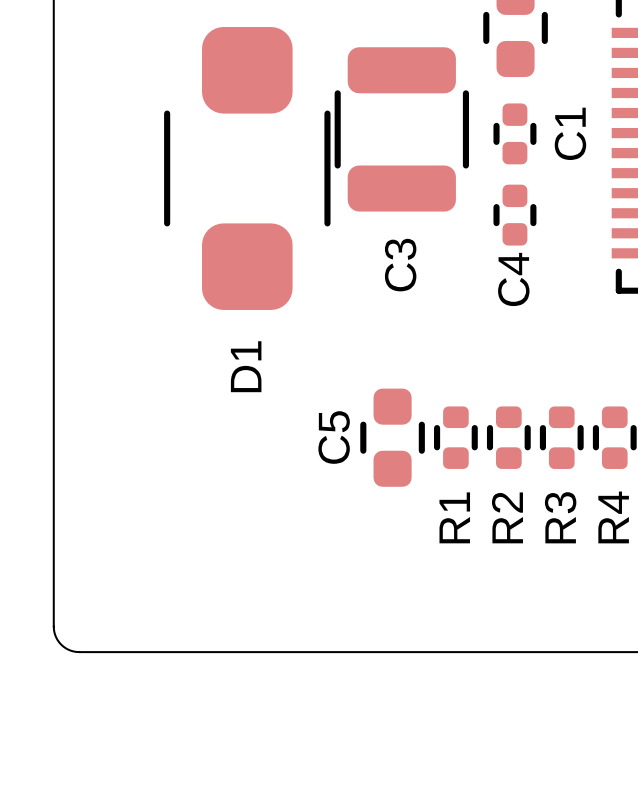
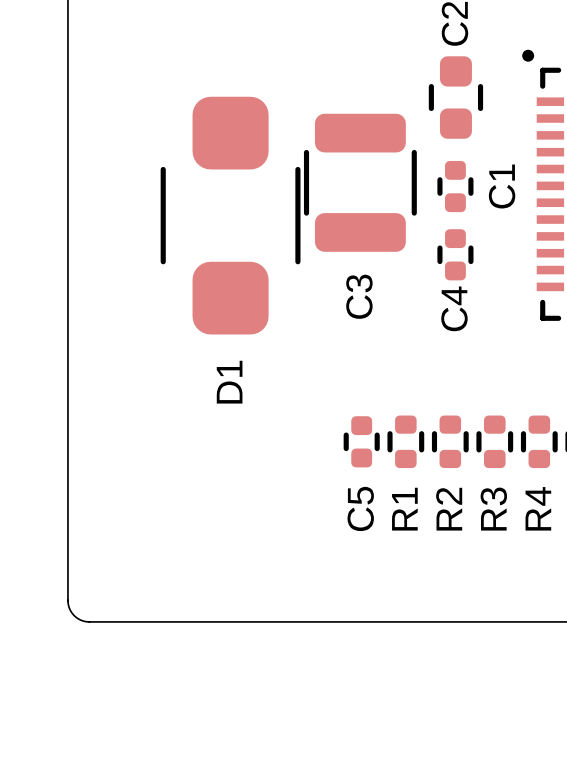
C5 footprint: [360, 388, 425, 487] -> [343, 416, 380, 468]
C5 name position: C5 (334, 437) -> C5 (360, 508)

